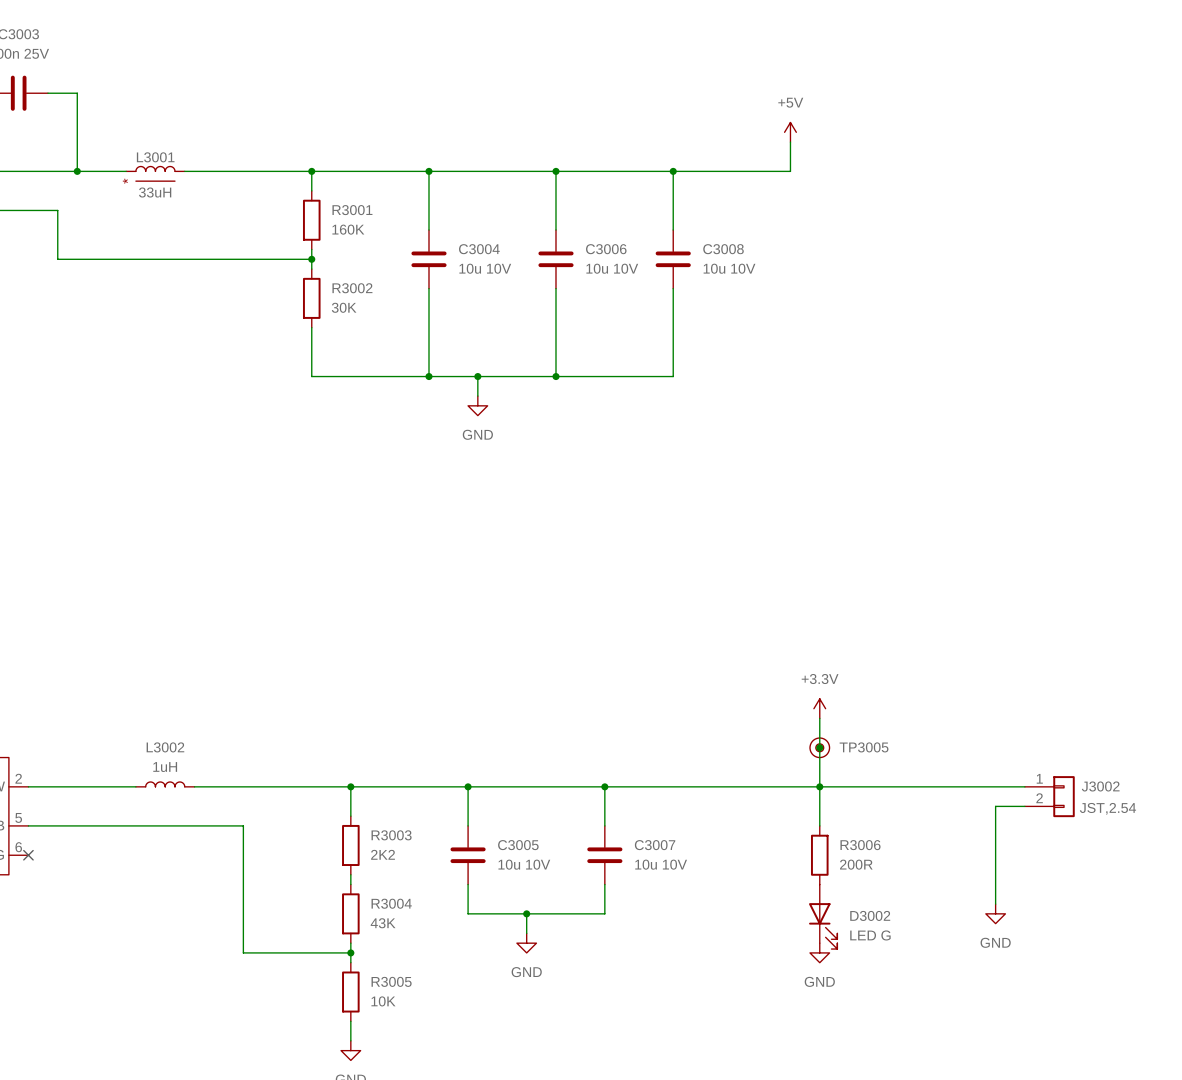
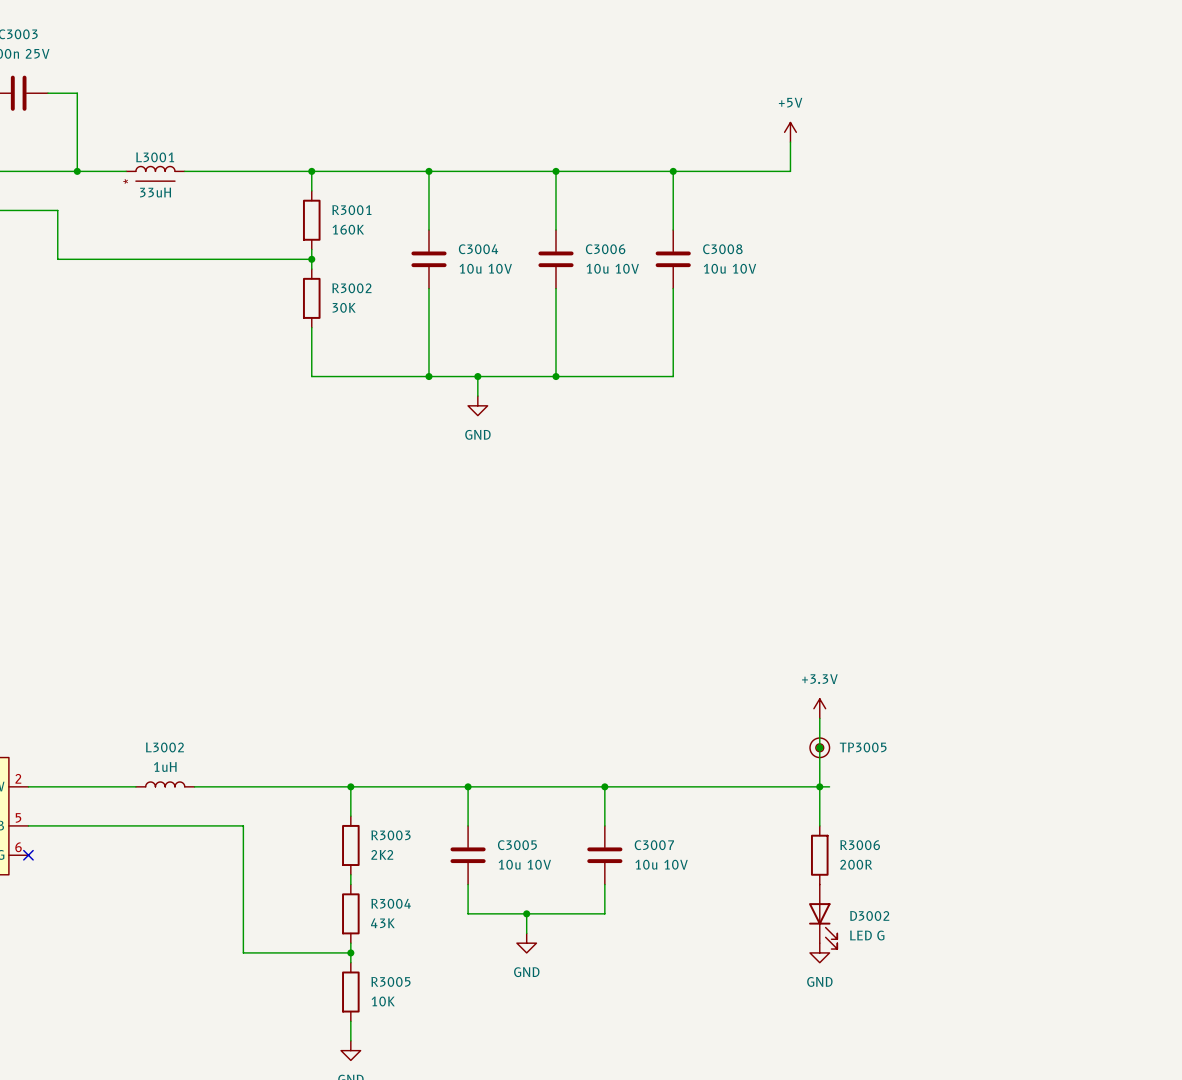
wire: (829, 786) (1024, 786) -> none
J3002: JST,2.54 (1049, 796) -> none
wire: (1024, 806) (995, 806) (995, 904) -> none
power symbol: GND (995, 913) -> none

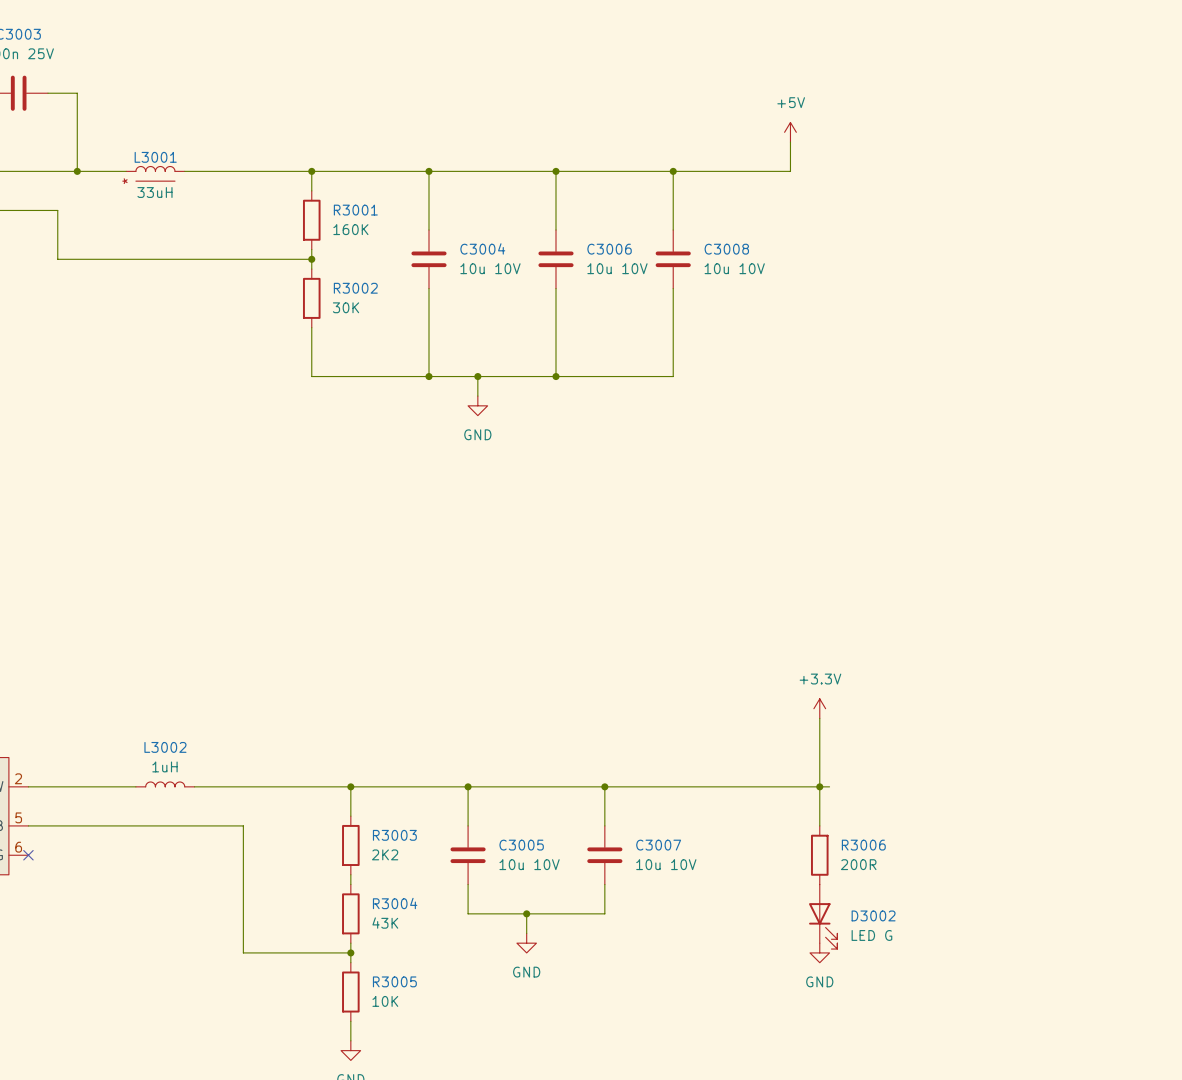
junction: (819, 747) -> none
TP3005: (819, 747) -> none

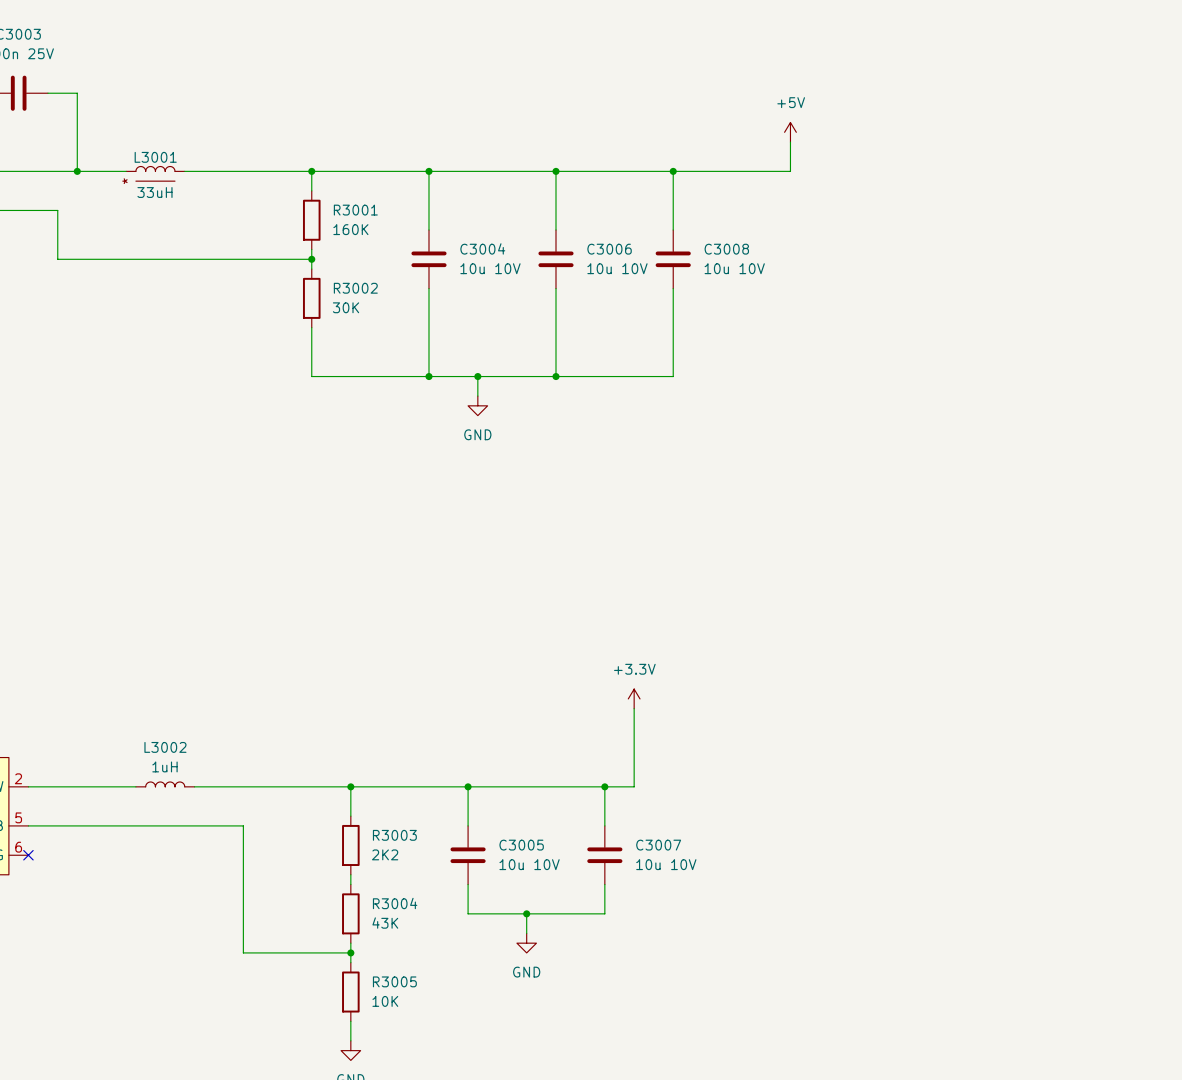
power symbol position: +3.3V (819, 708) -> +3.3V (634, 698)
wire: (819, 718) (819, 825) -> none
wire: (634, 786) (829, 786) -> (634, 786) (634, 708)
junction: (819, 786) -> none
R3006: 200R (819, 855) -> none
D3002: LED G (823, 916) -> none
power symbol: GND (819, 952) -> none

